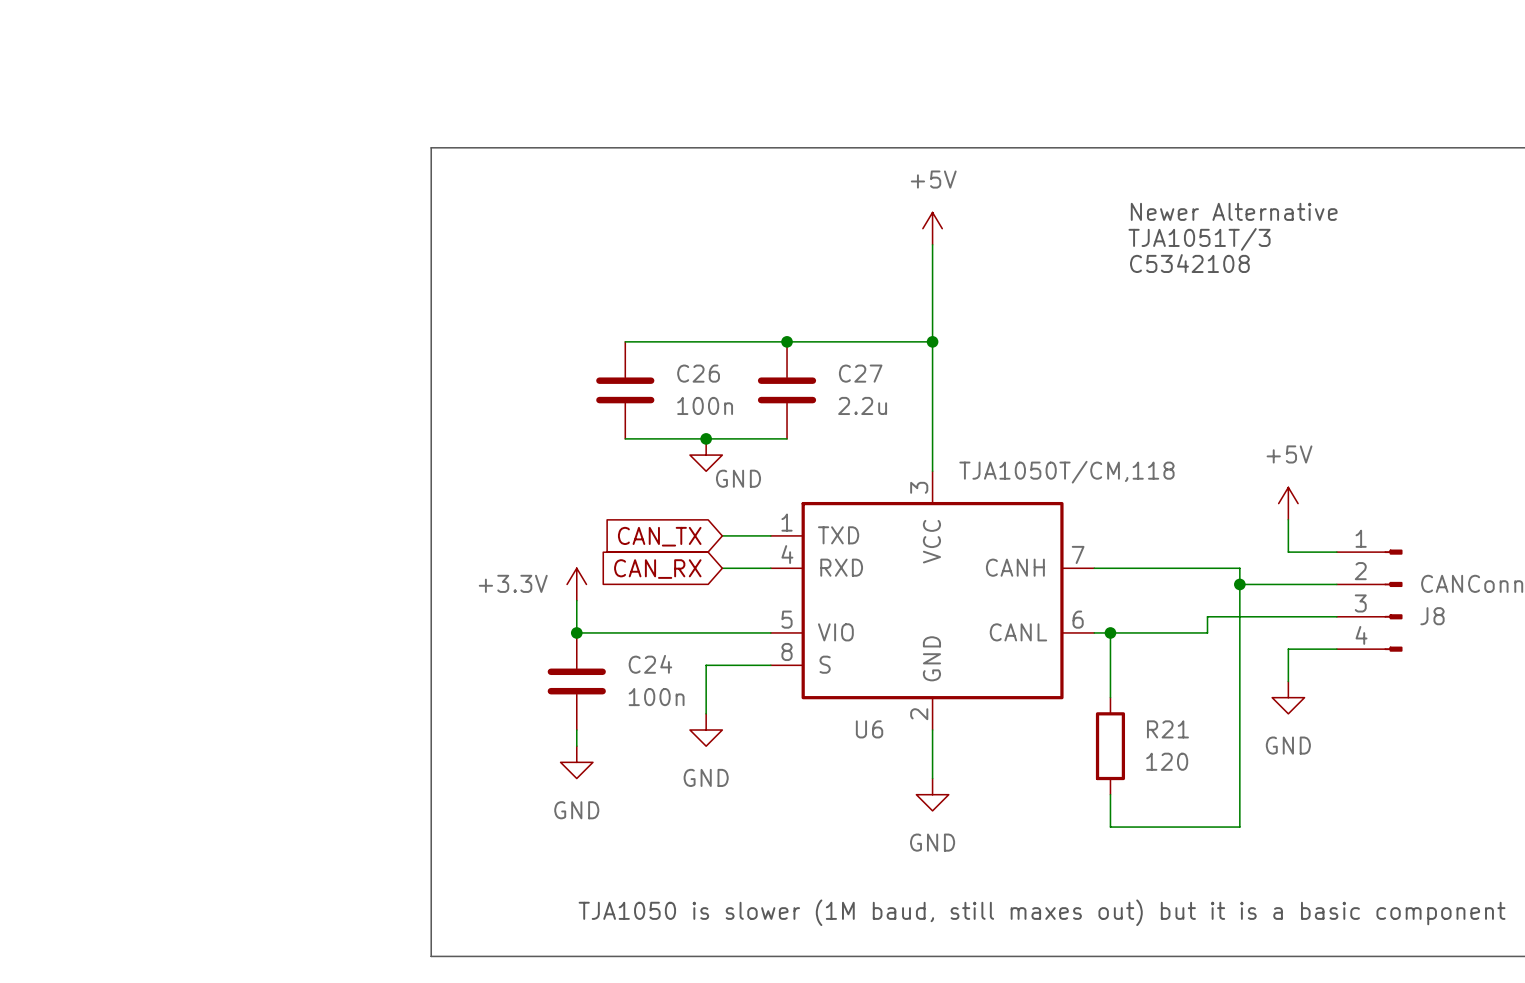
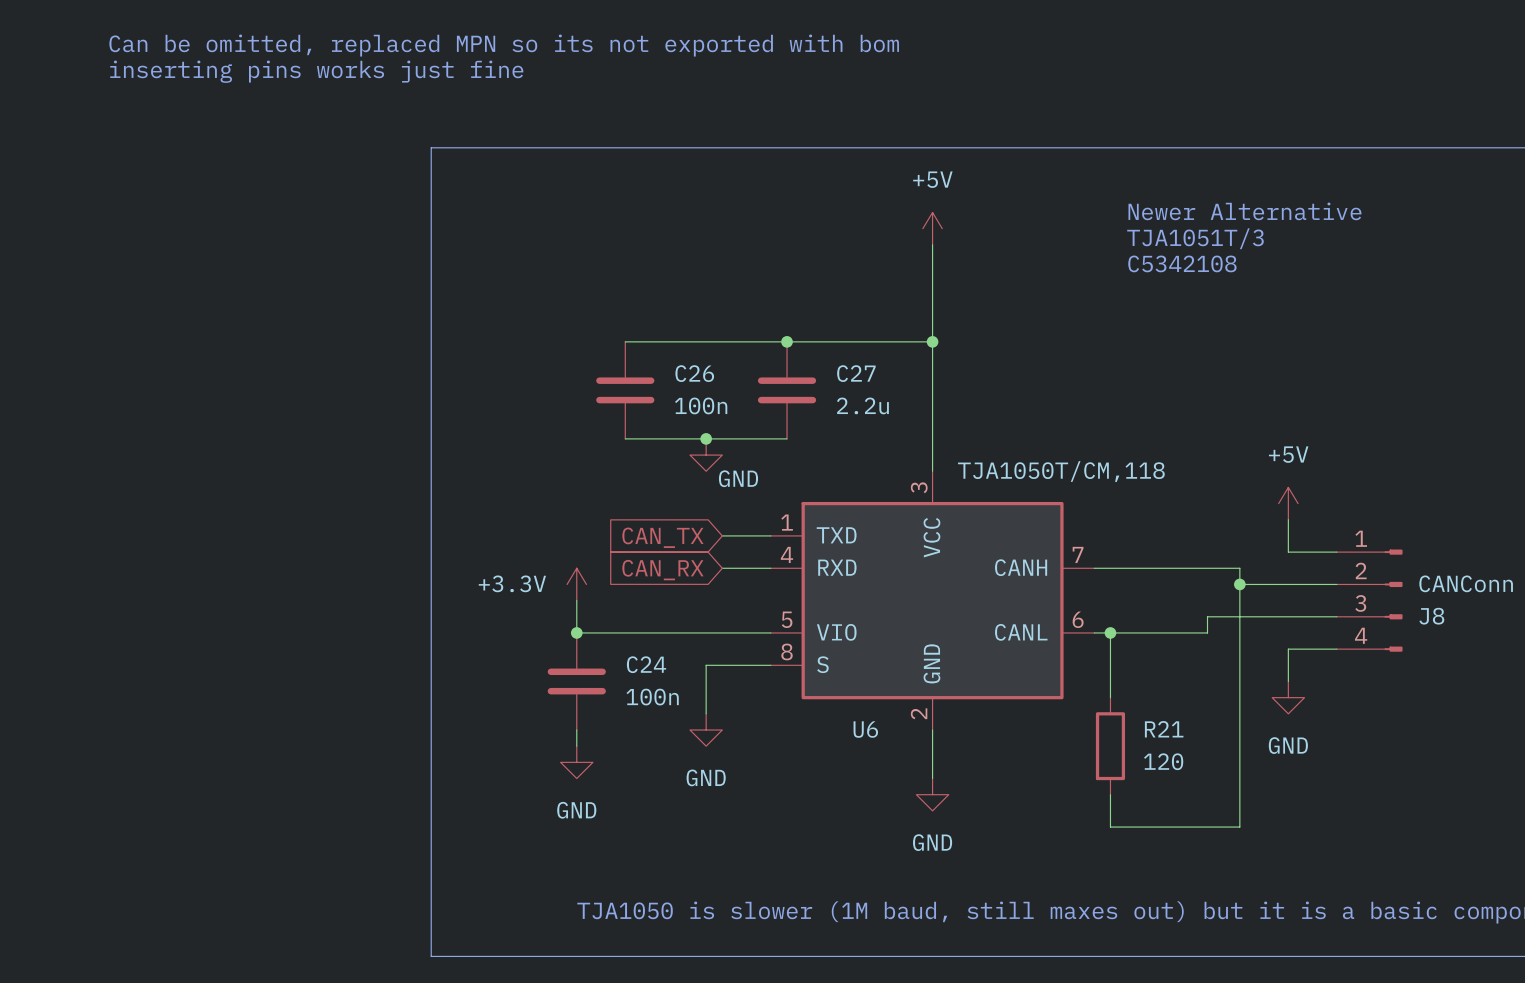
text: none -> Can be omitted, replaced MPN so its not exported with bom (504, 45)
text: none -> inserting pins works just fine (316, 71)

